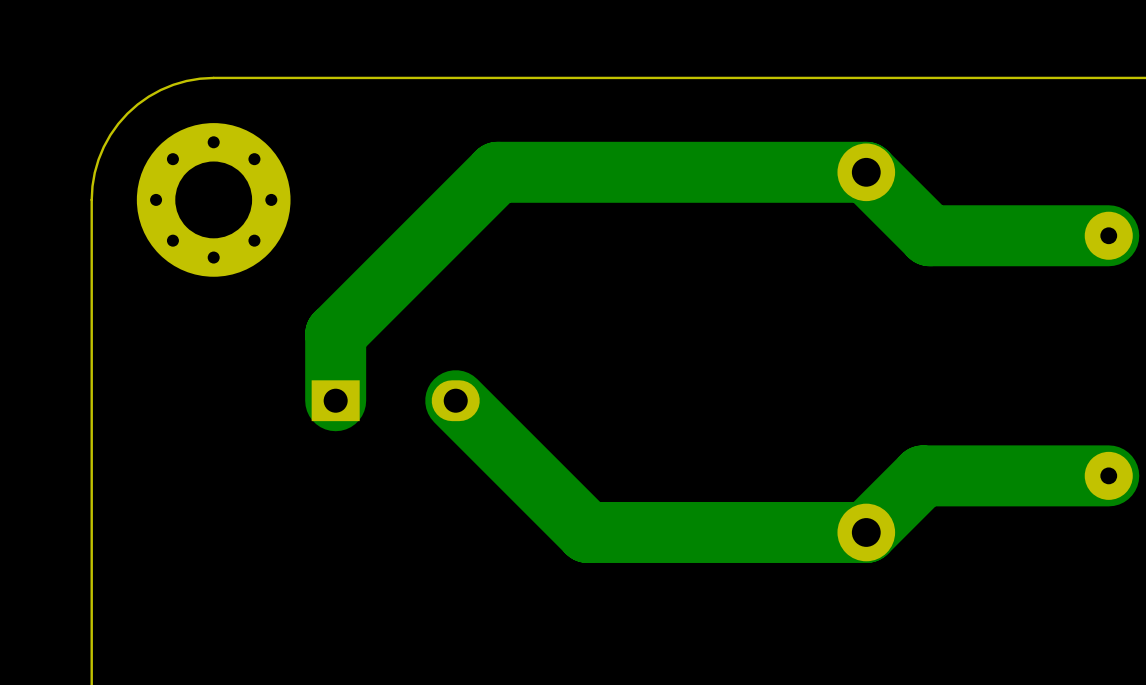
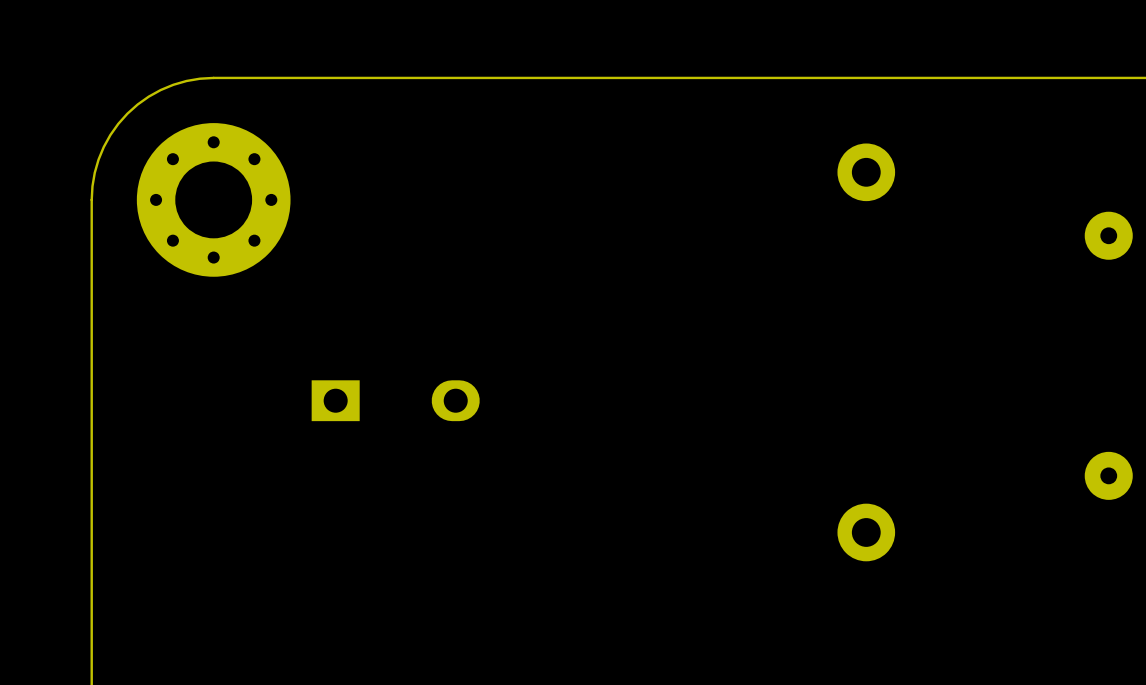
bottom track: (1108, 235) (929, 235) (866, 172) (497, 172) (335, 334) (335, 400) -> none
bottom track: (455, 400) (587, 532) (866, 532) (922, 475) (1108, 475) -> none

